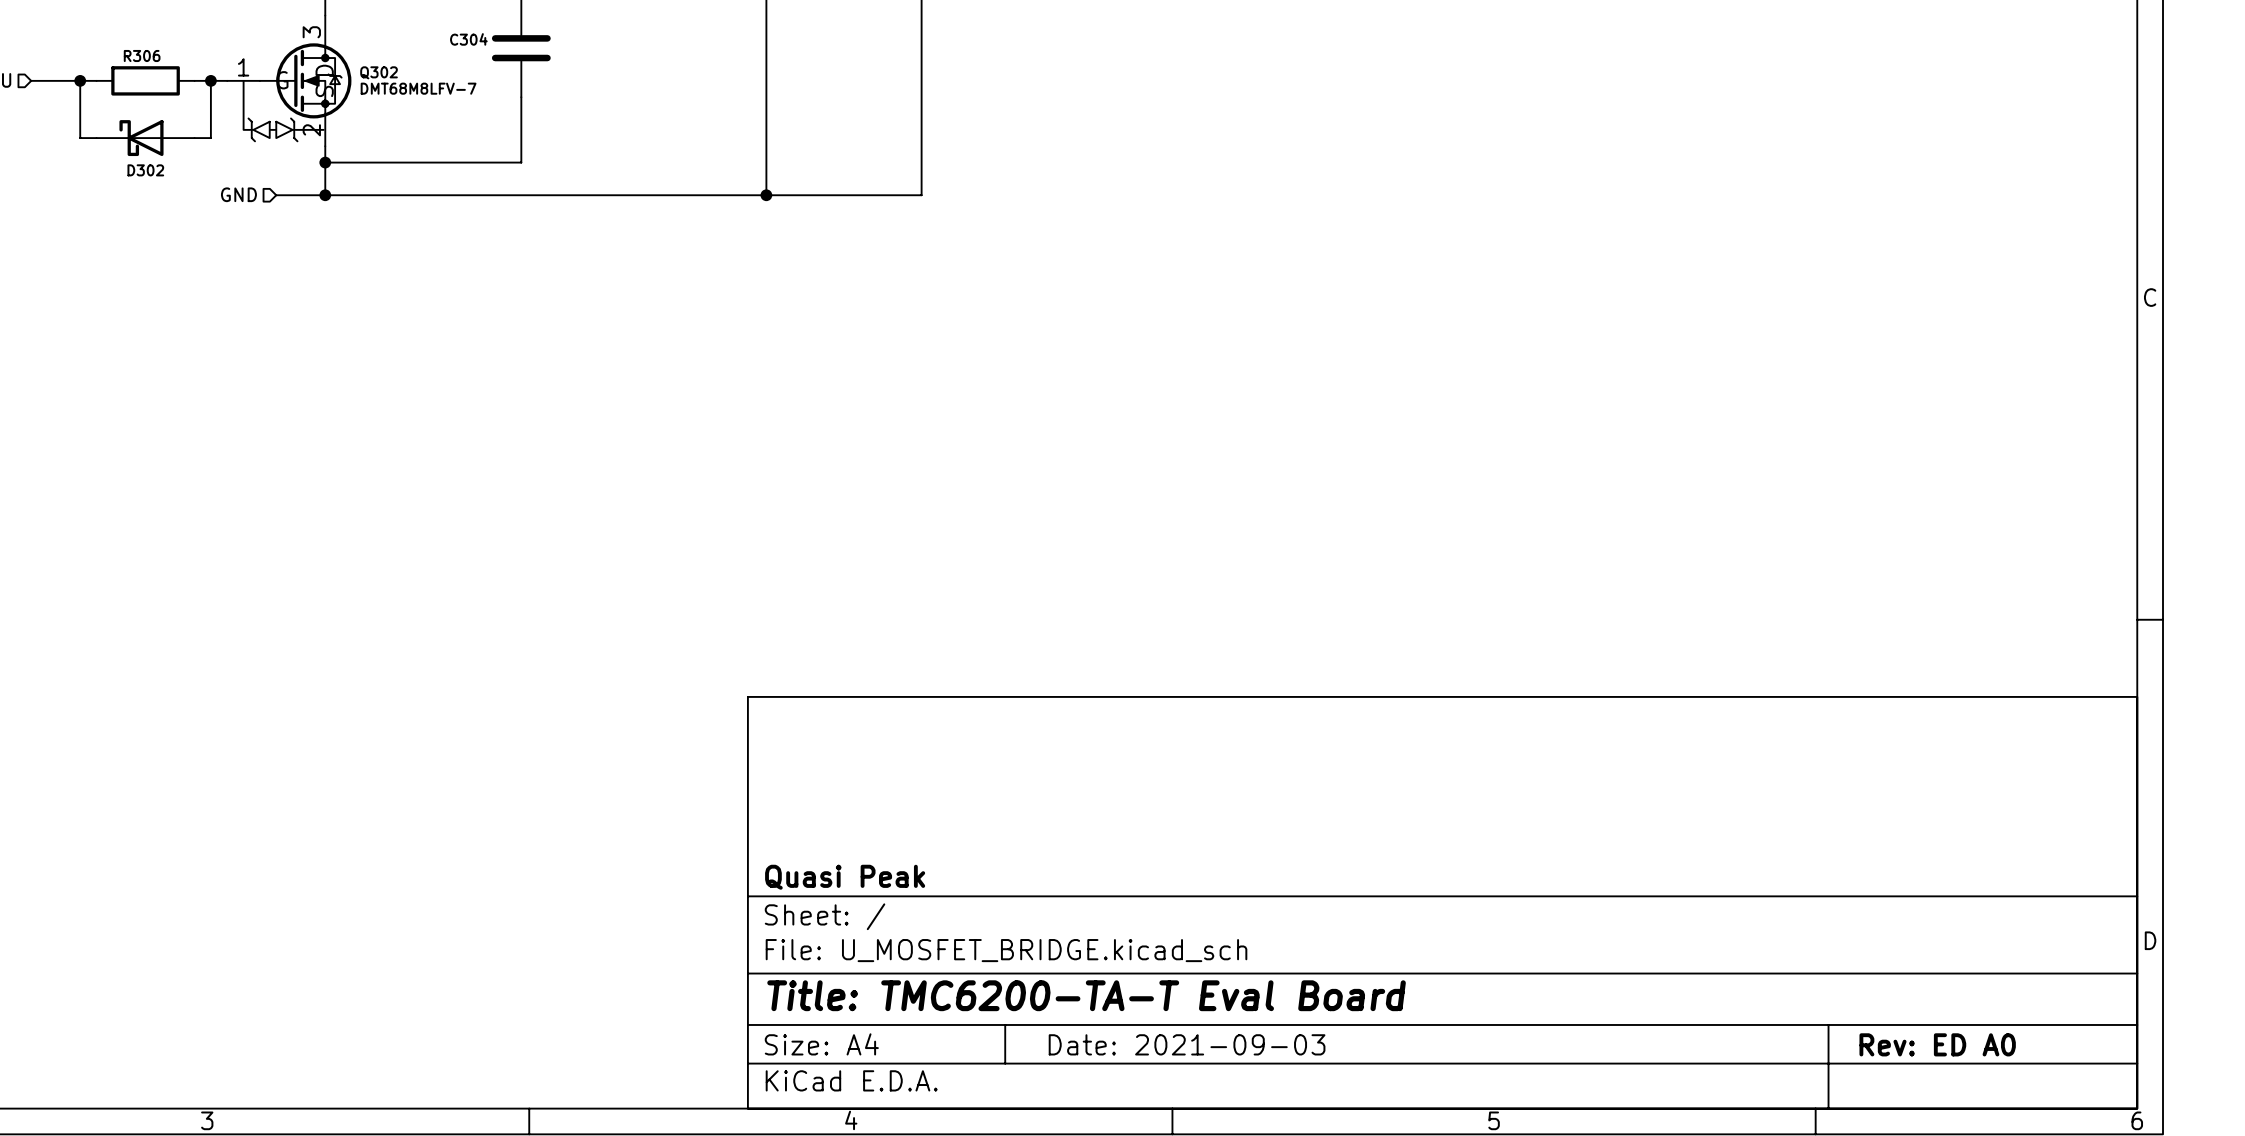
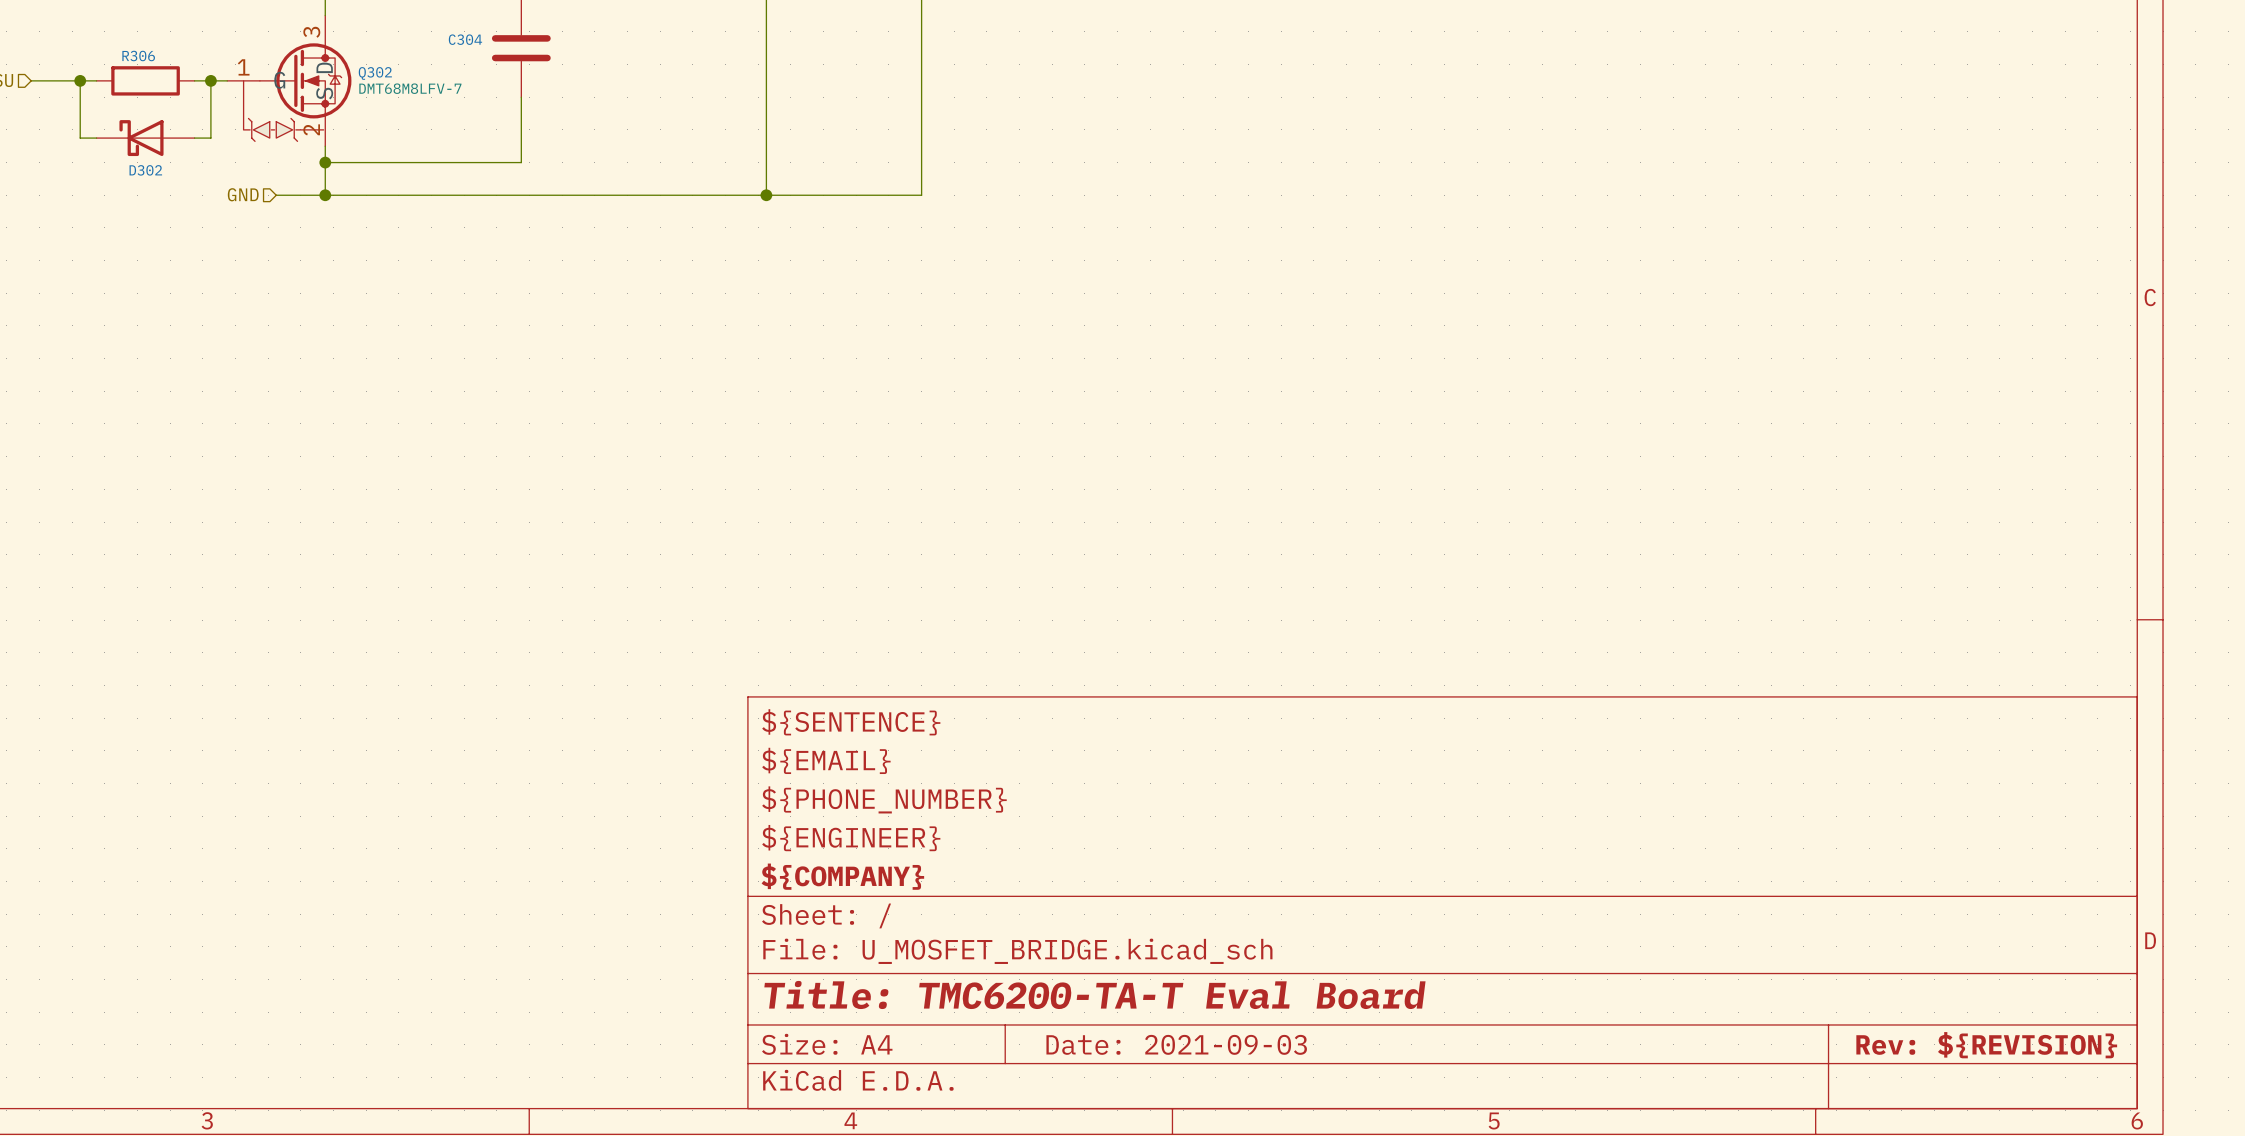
title block: none -> ${SENTENCE} (851, 722)
title block: none -> ${EMAIL} (826, 760)
title block: none -> ${PHONE_NUMBER} (884, 799)
title block: none -> ${ENGINEER} (851, 838)
title block: Quasi Peak (845, 877) -> ${COMPANY} (842, 876)
title block: Rev: ED A0 (1937, 1044) -> Rev: ${REVISION} (1986, 1045)

